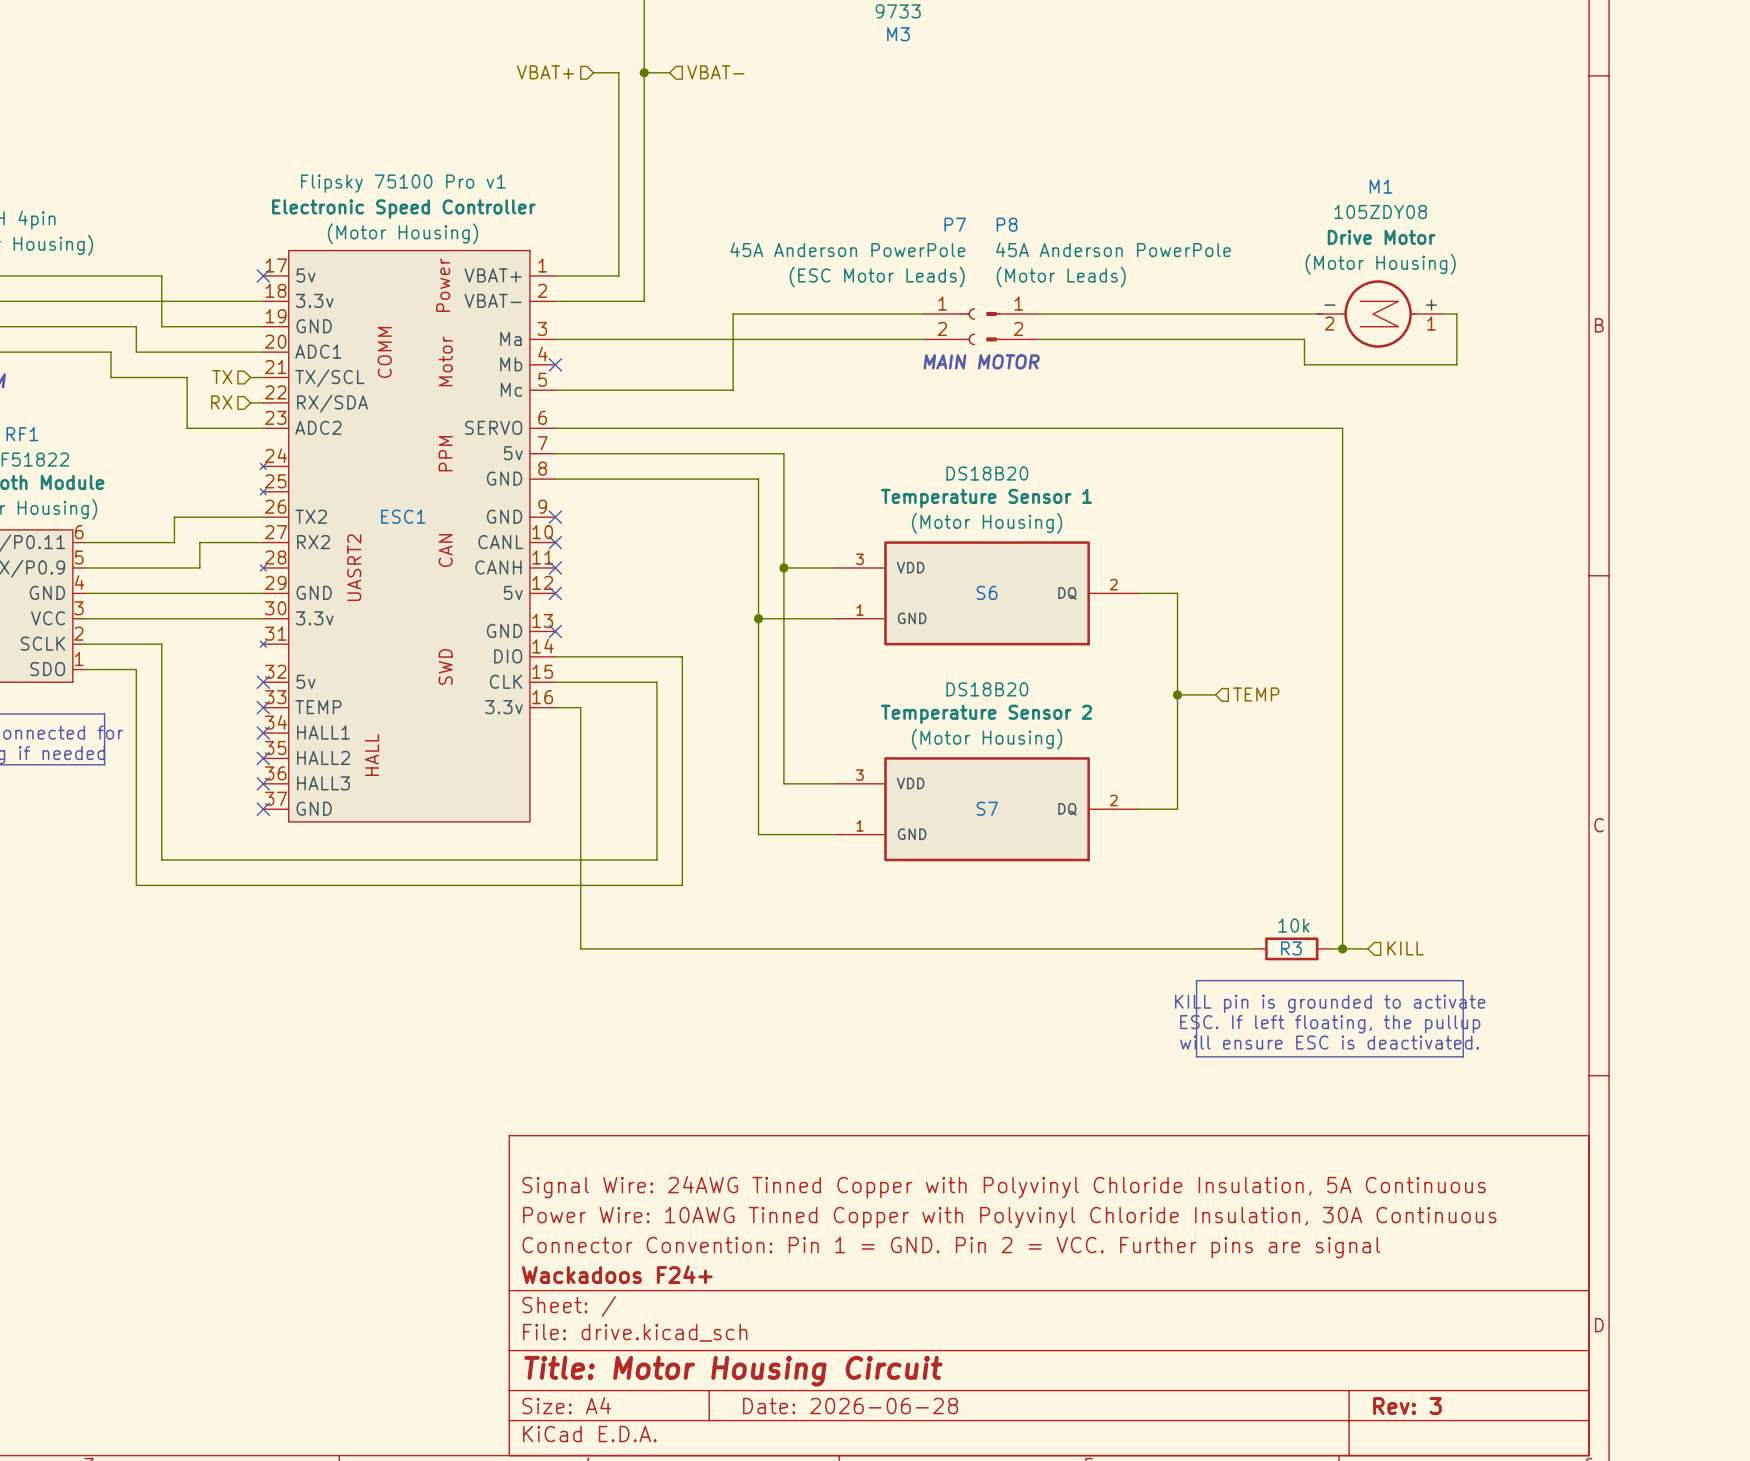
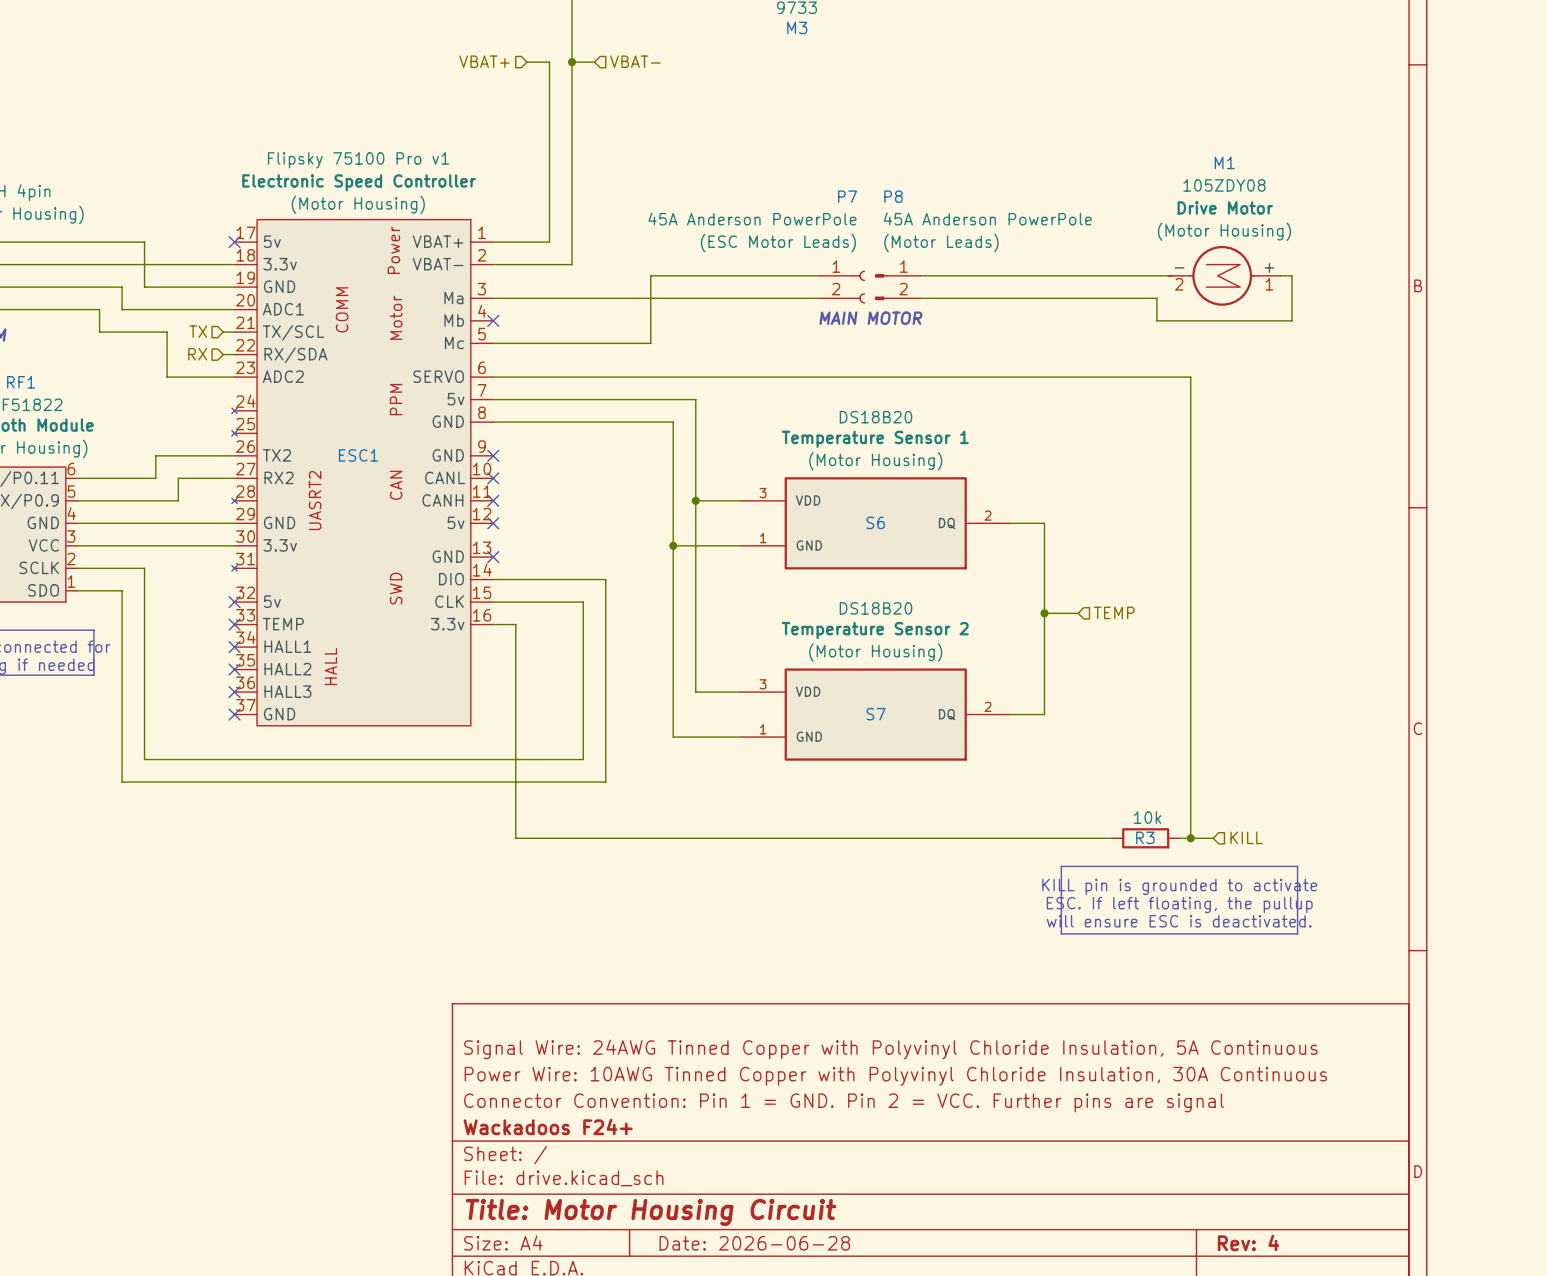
title block: Rev: 3 (1407, 1406) -> Rev: 4 (1248, 1242)

